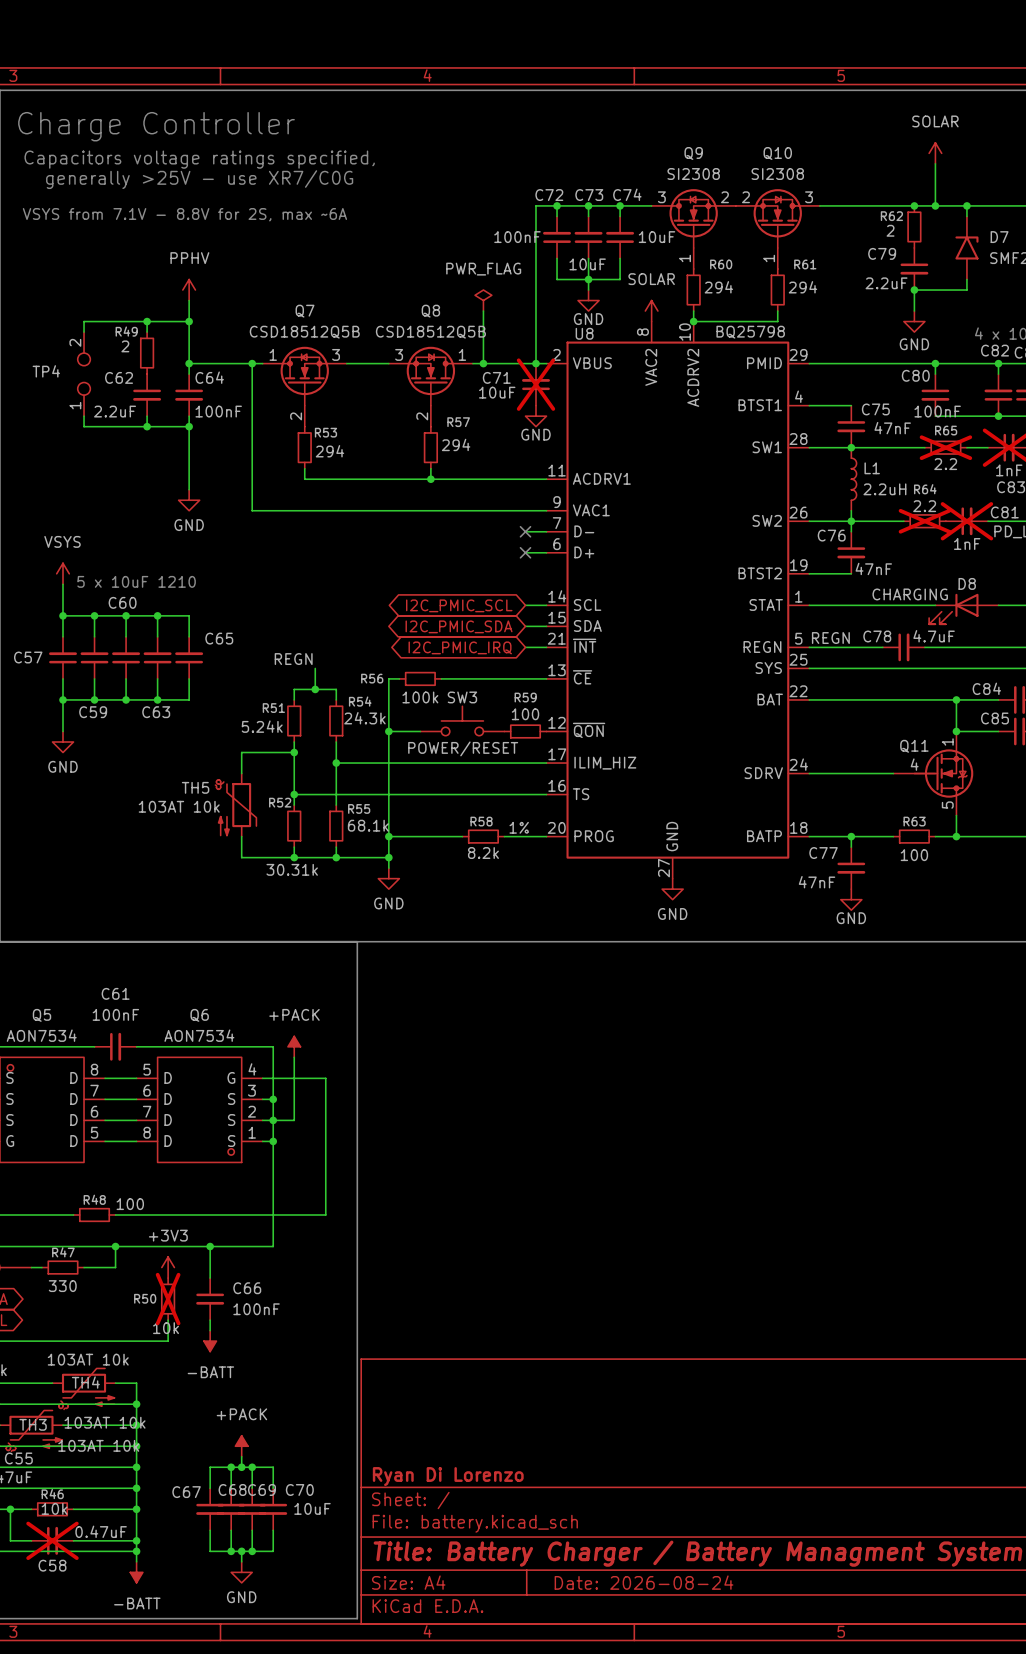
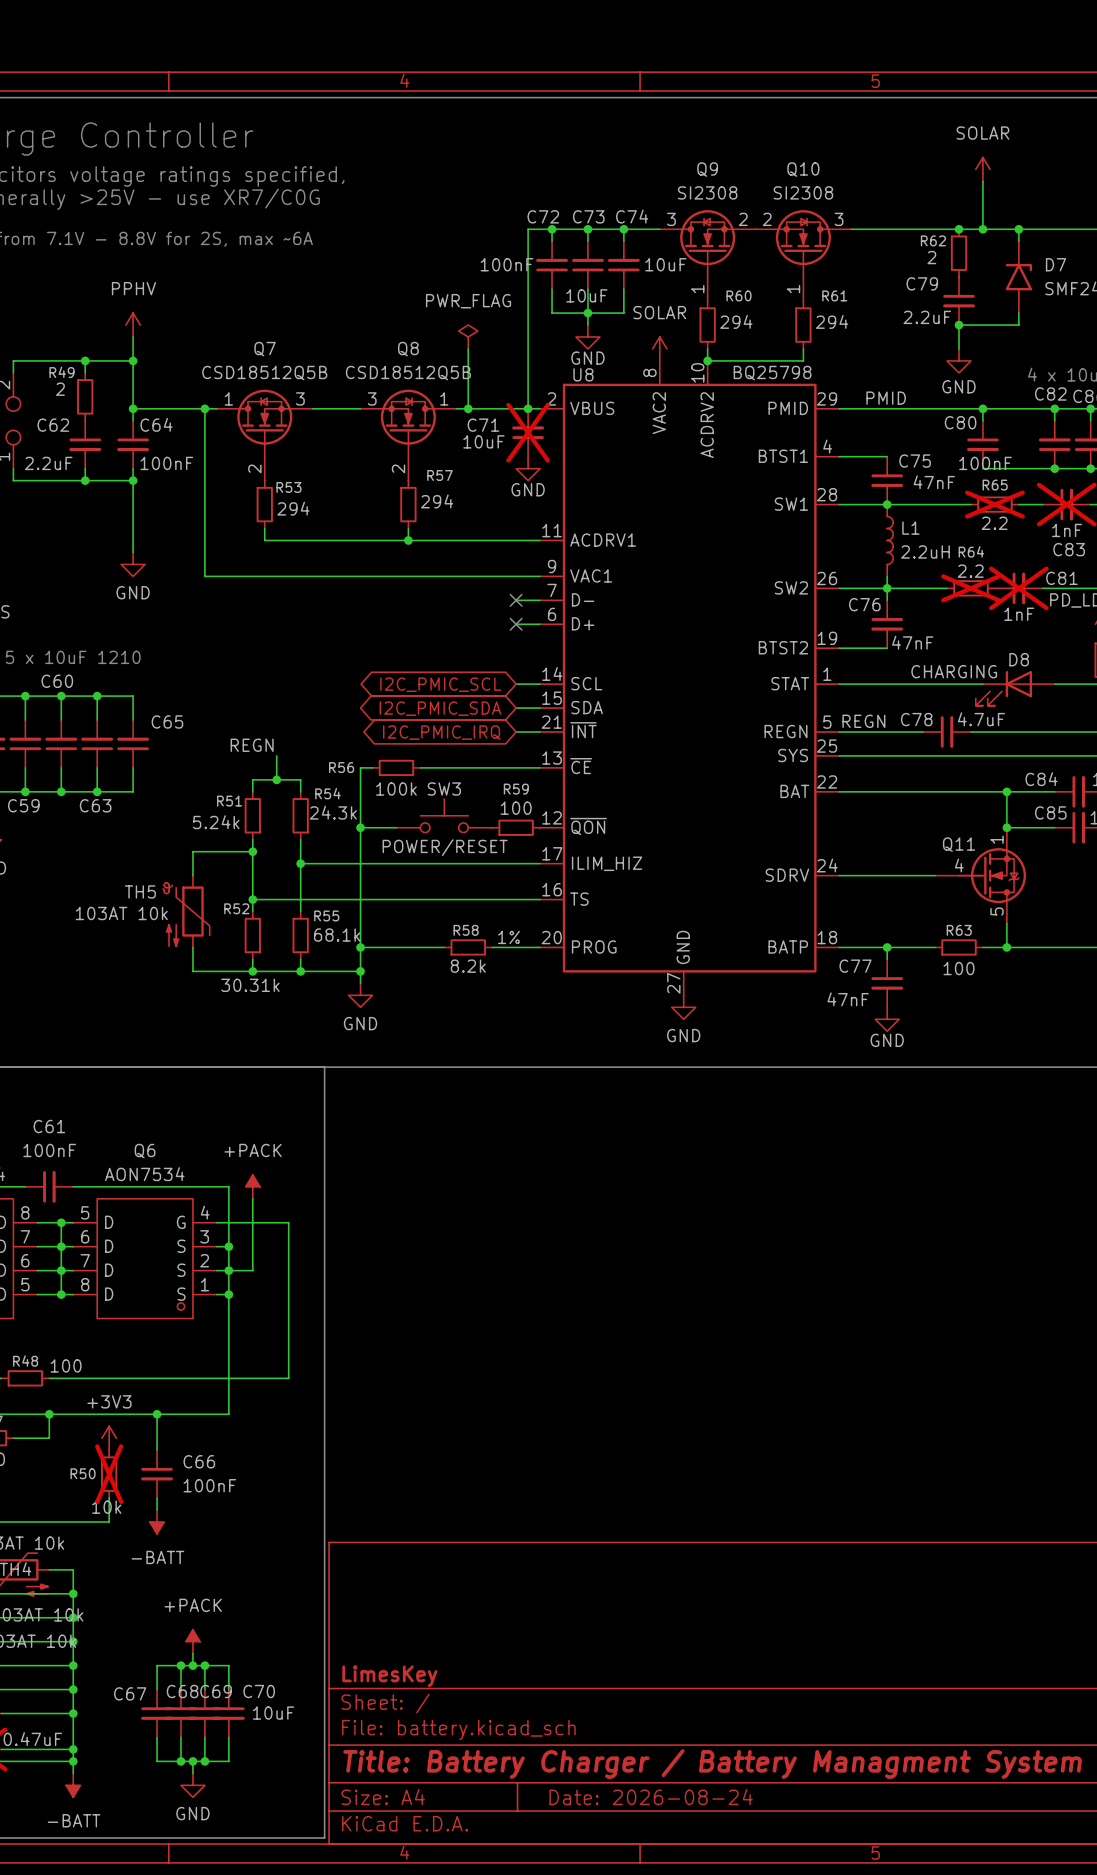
label: none -> PMID (886, 398)
wire: none -> (61, 1222) (61, 1294)
junction: none -> (61, 1222)
junction: none -> (61, 1246)
junction: none -> (61, 1270)
junction: none -> (61, 1294)
title block: Ryan Di Lorenzo (448, 1476) -> LimesKey (389, 1676)

